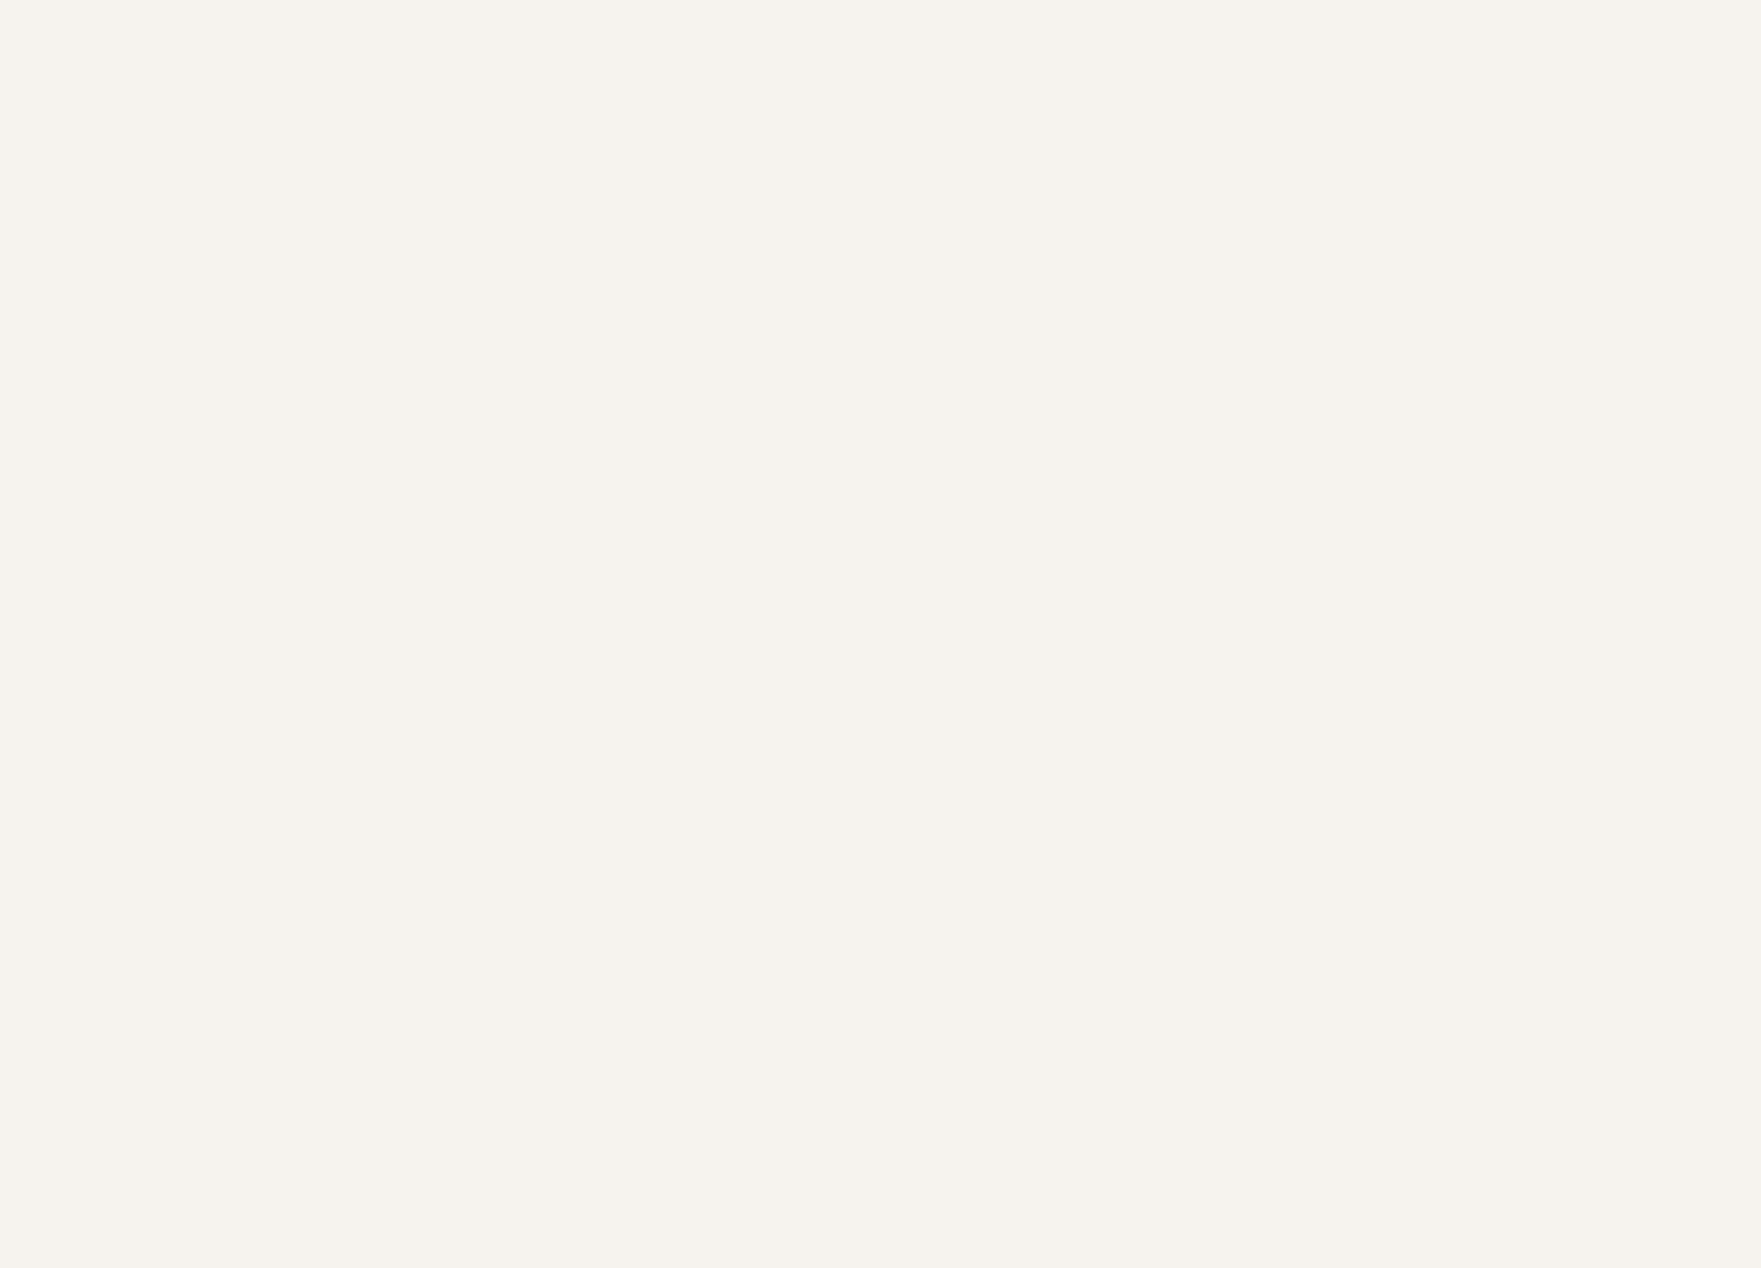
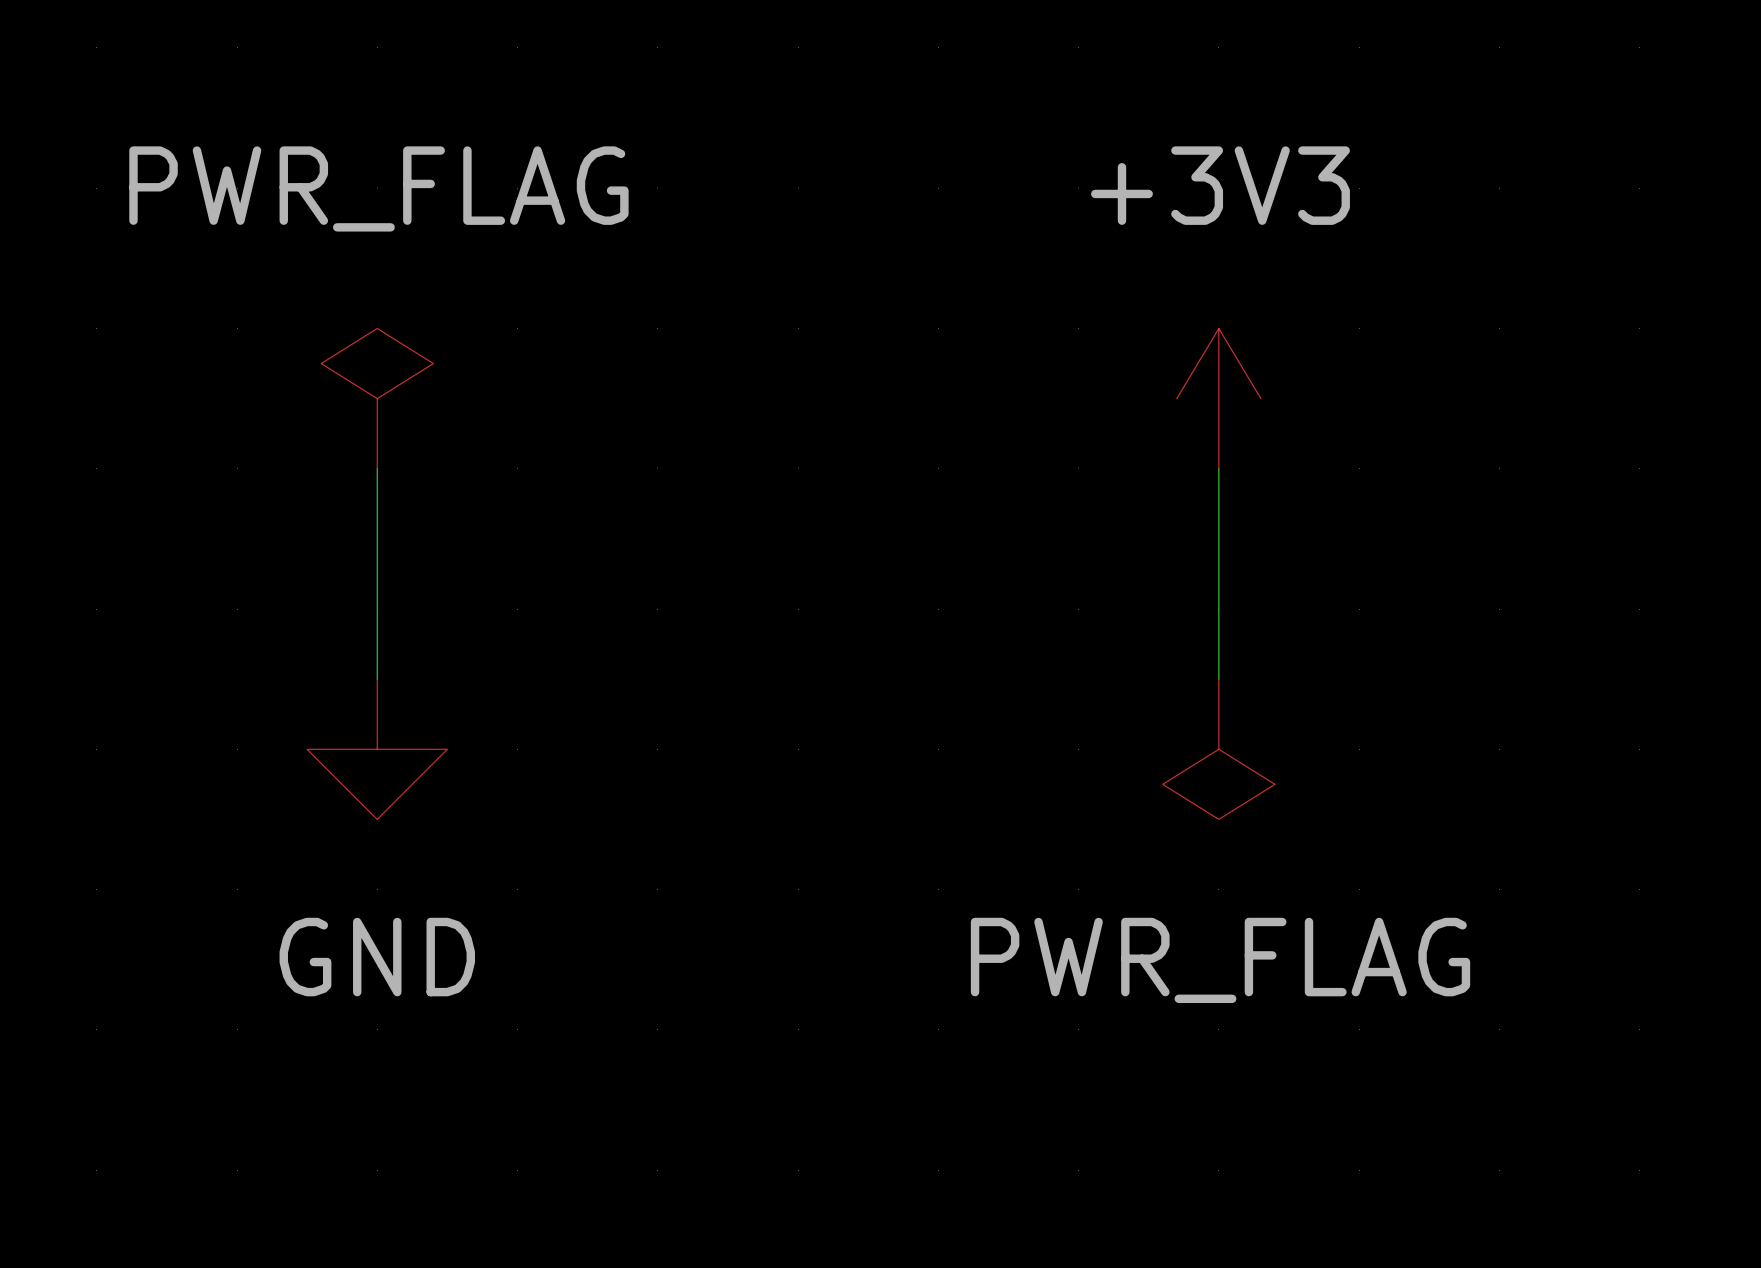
power symbol: none -> PWR_FLAG (377, 398)
power symbol: none -> +3V3 (1218, 398)
wire: none -> (377, 468) (377, 679)
wire: none -> (1218, 468) (1218, 679)
power symbol: none -> GND (377, 749)
power symbol: none -> PWR_FLAG (1218, 749)

